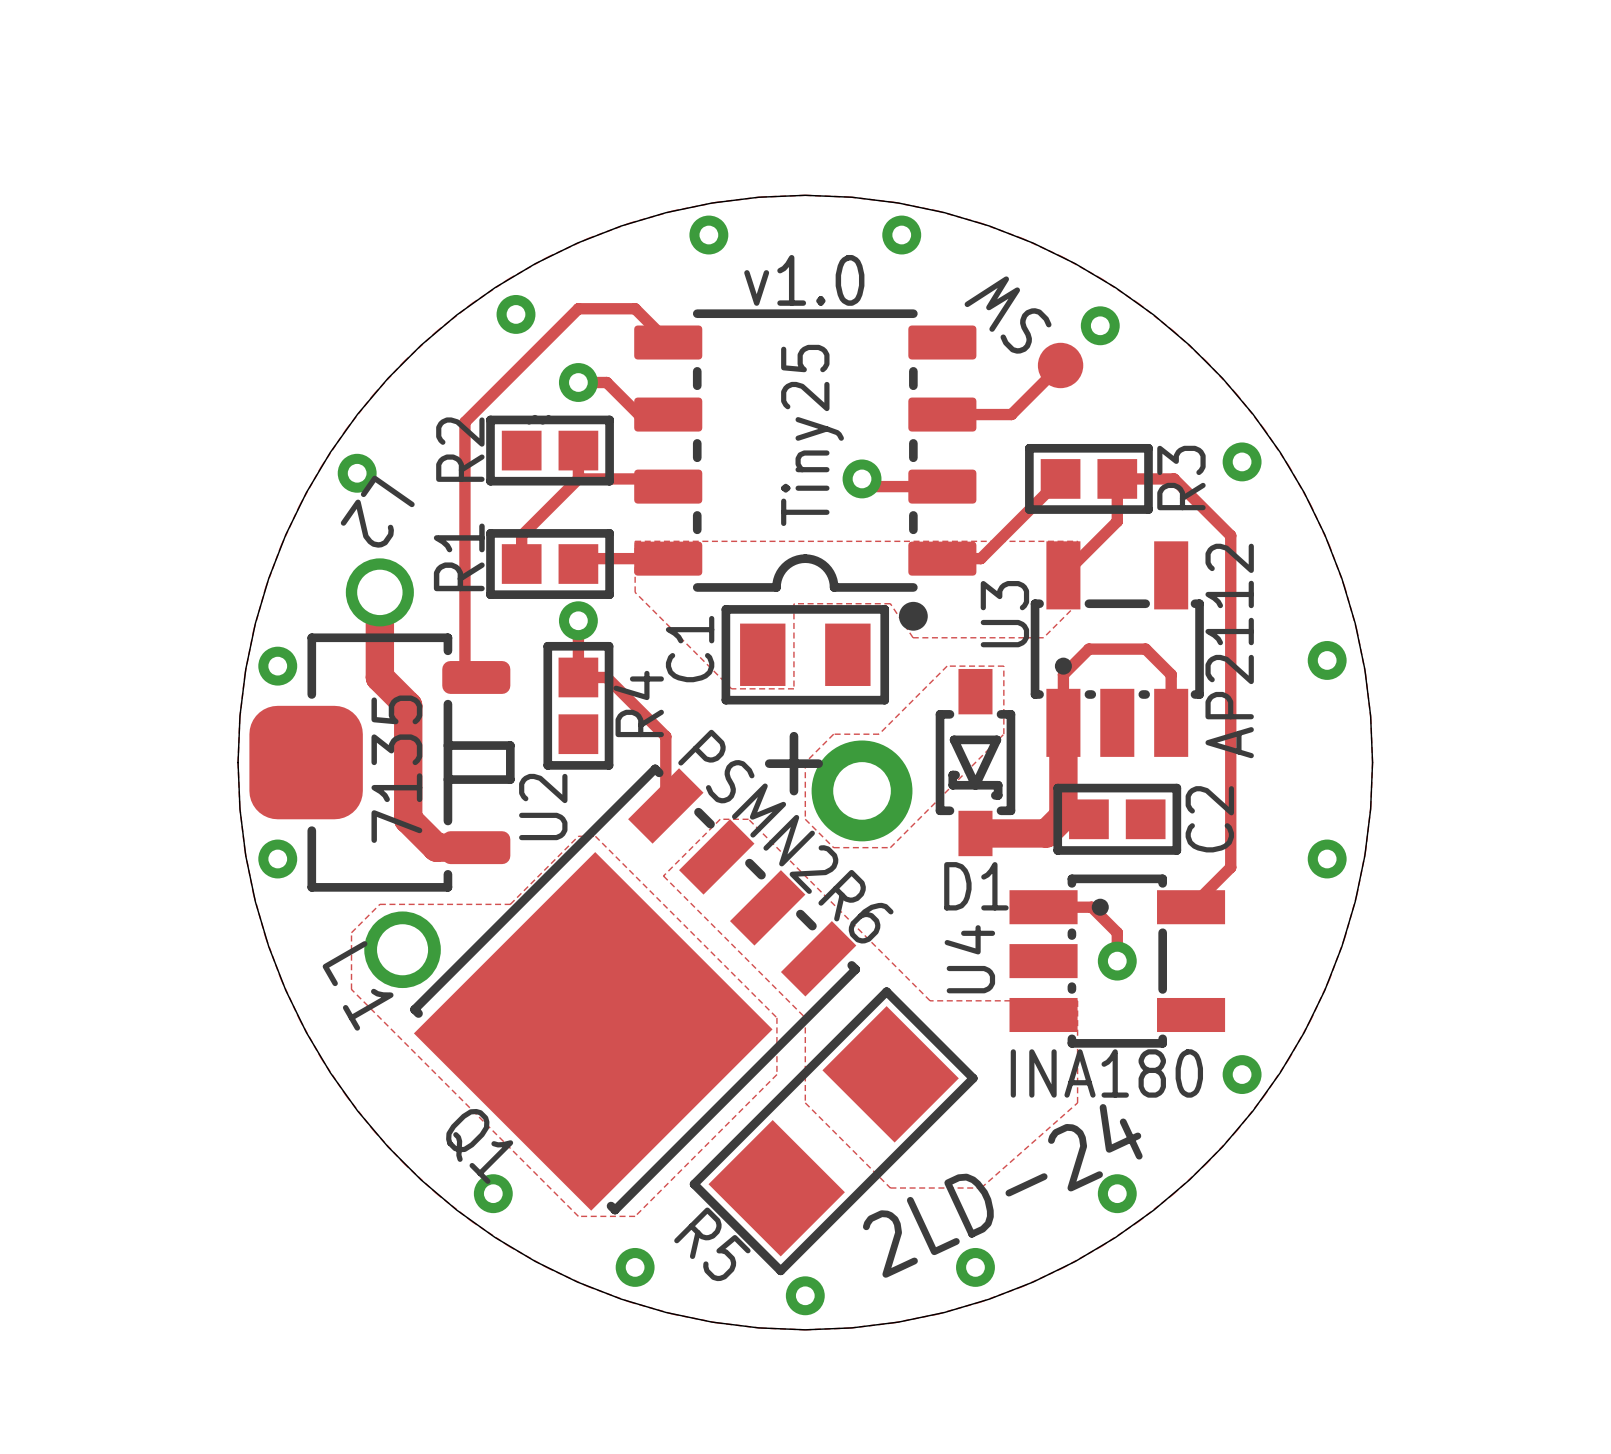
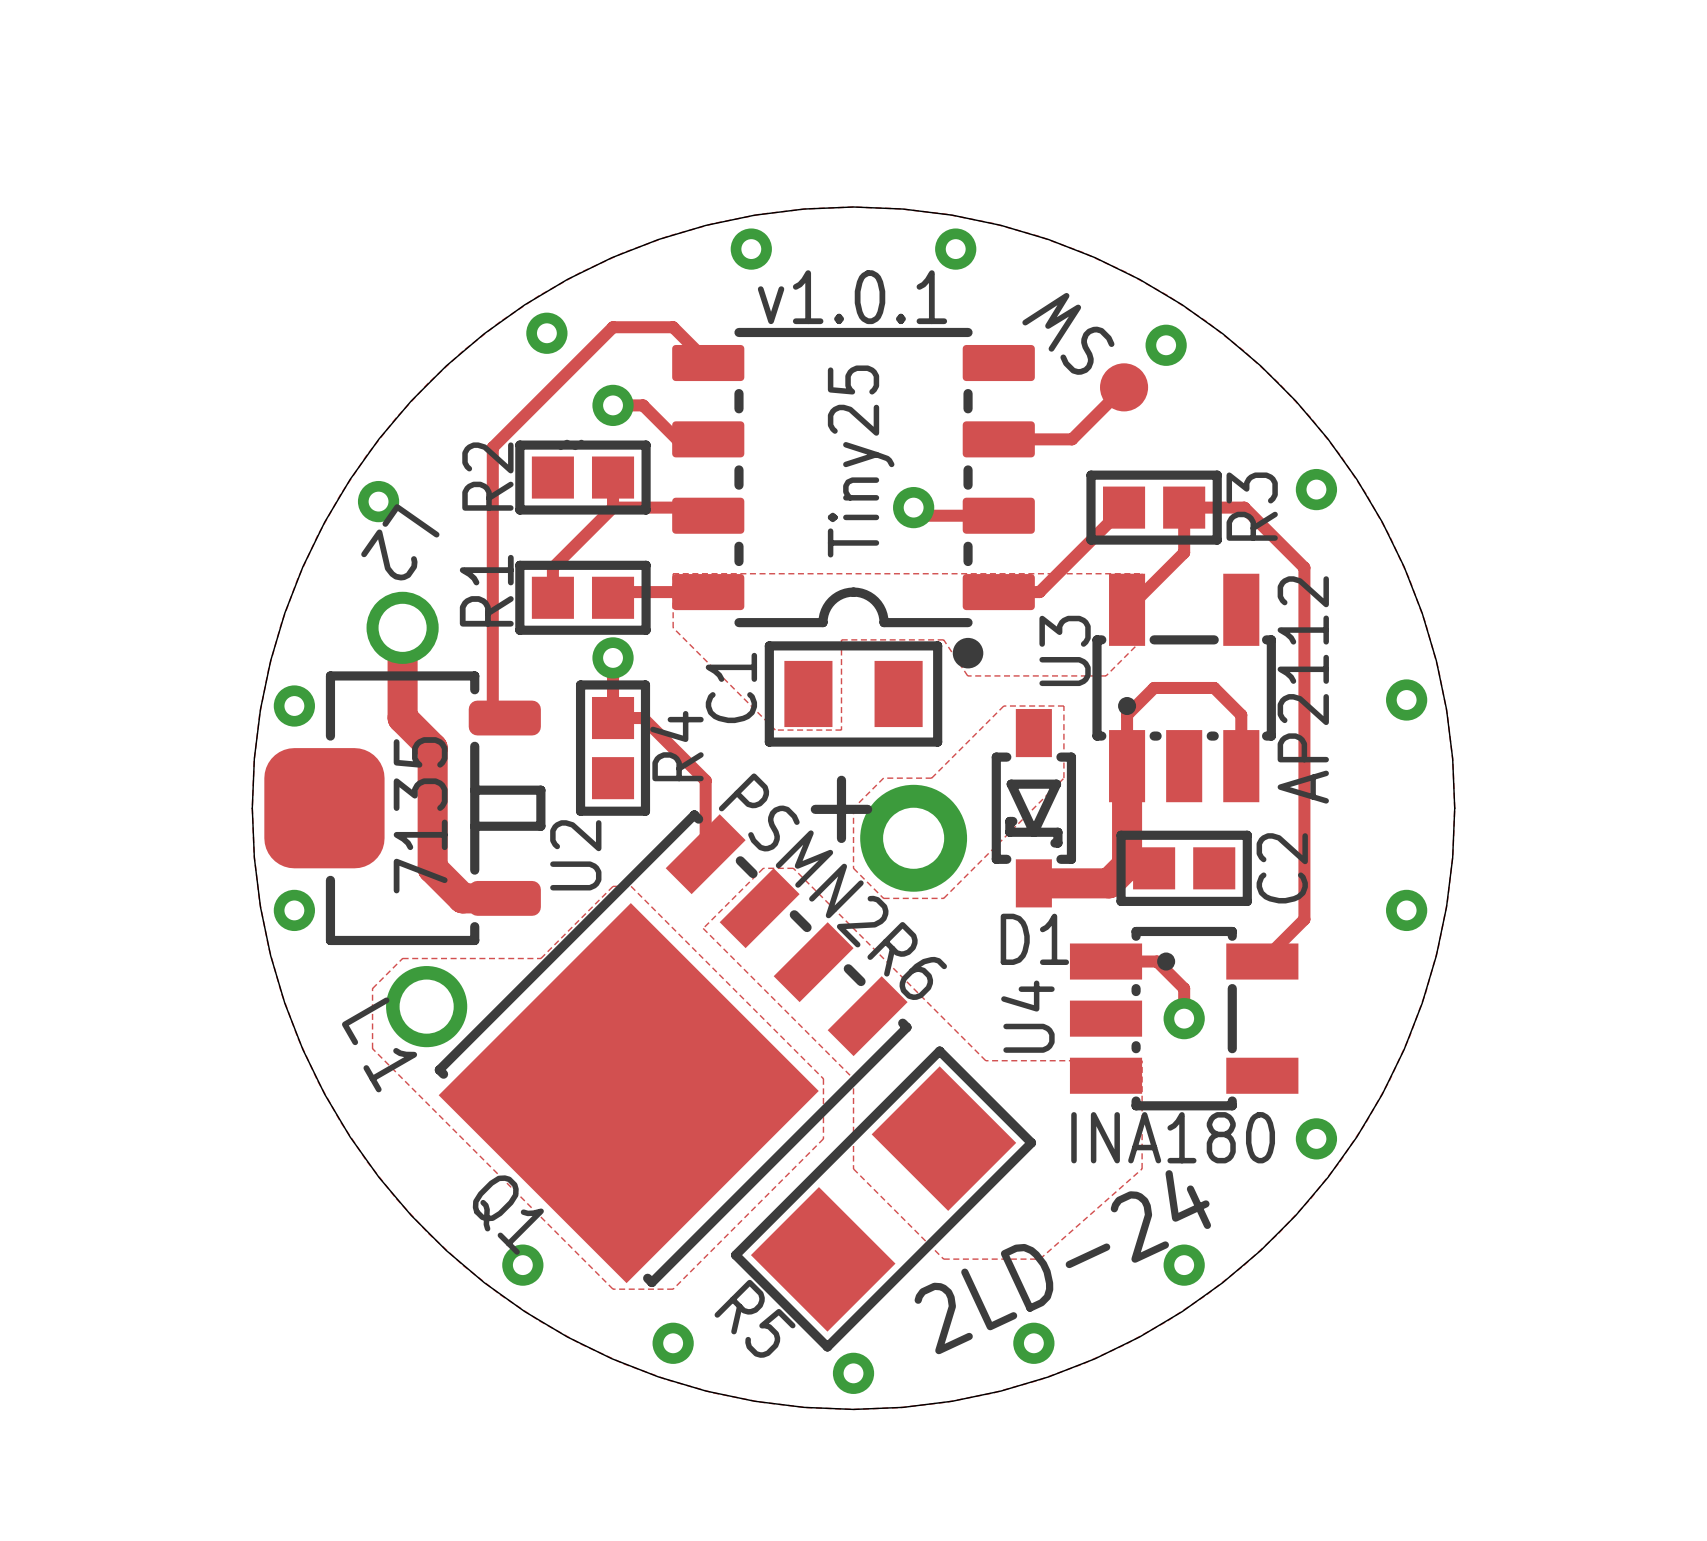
text: v1.0 (804, 280) -> v1.0.1 (852, 297)

